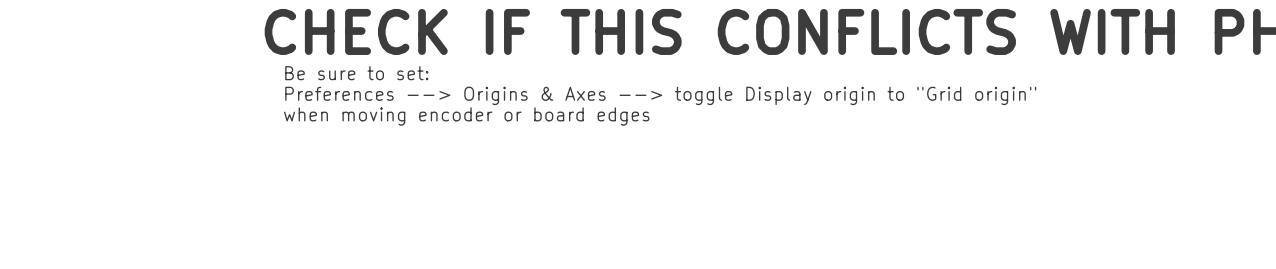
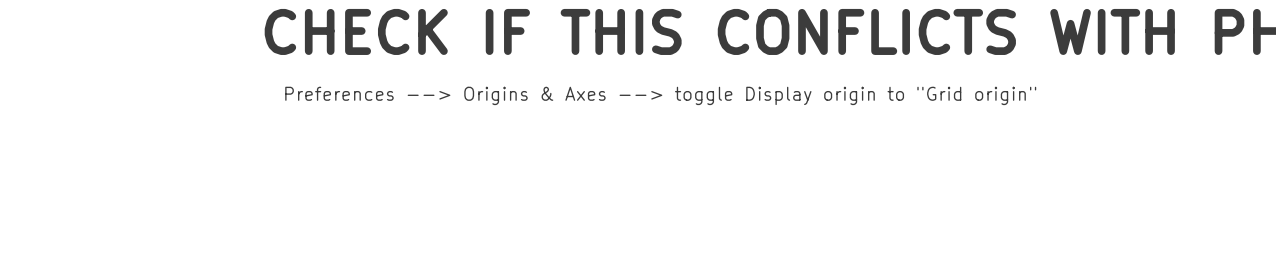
text: Be sure to set: (356, 73) -> none
text: when moving encoder or board edges (466, 116) -> none

